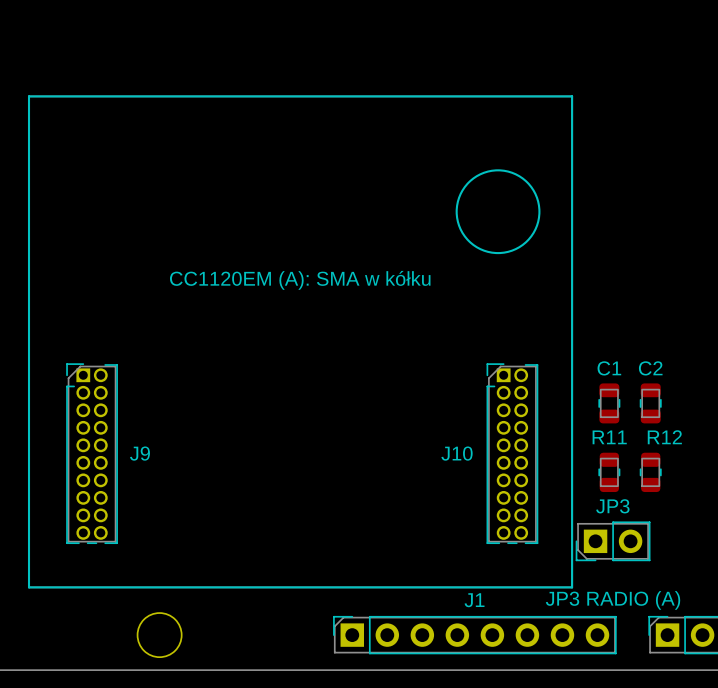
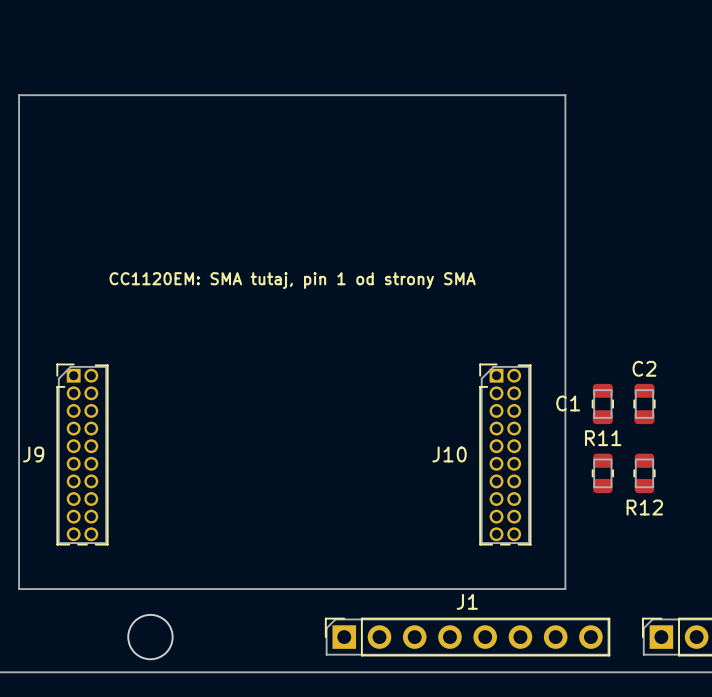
line: (29, 96) (572, 96) (572, 587) (29, 587) (29, 96) -> none
drawing: [455, 169, 541, 255] -> none
text: CC1120EM (A): SMA w kółku (300, 280) -> CC1120EM: SMA tutaj, pin 1 od strony SMA (292, 280)
C1 name position: C1 (609, 368) -> C1 (568, 403)
R12 name position: R12 (664, 437) -> R12 (644, 507)
J9 name position: J9 (140, 453) -> J9 (33, 454)
JP3: (613, 541) -> none
text: JP3 RADIO (A) (613, 600) -> none

